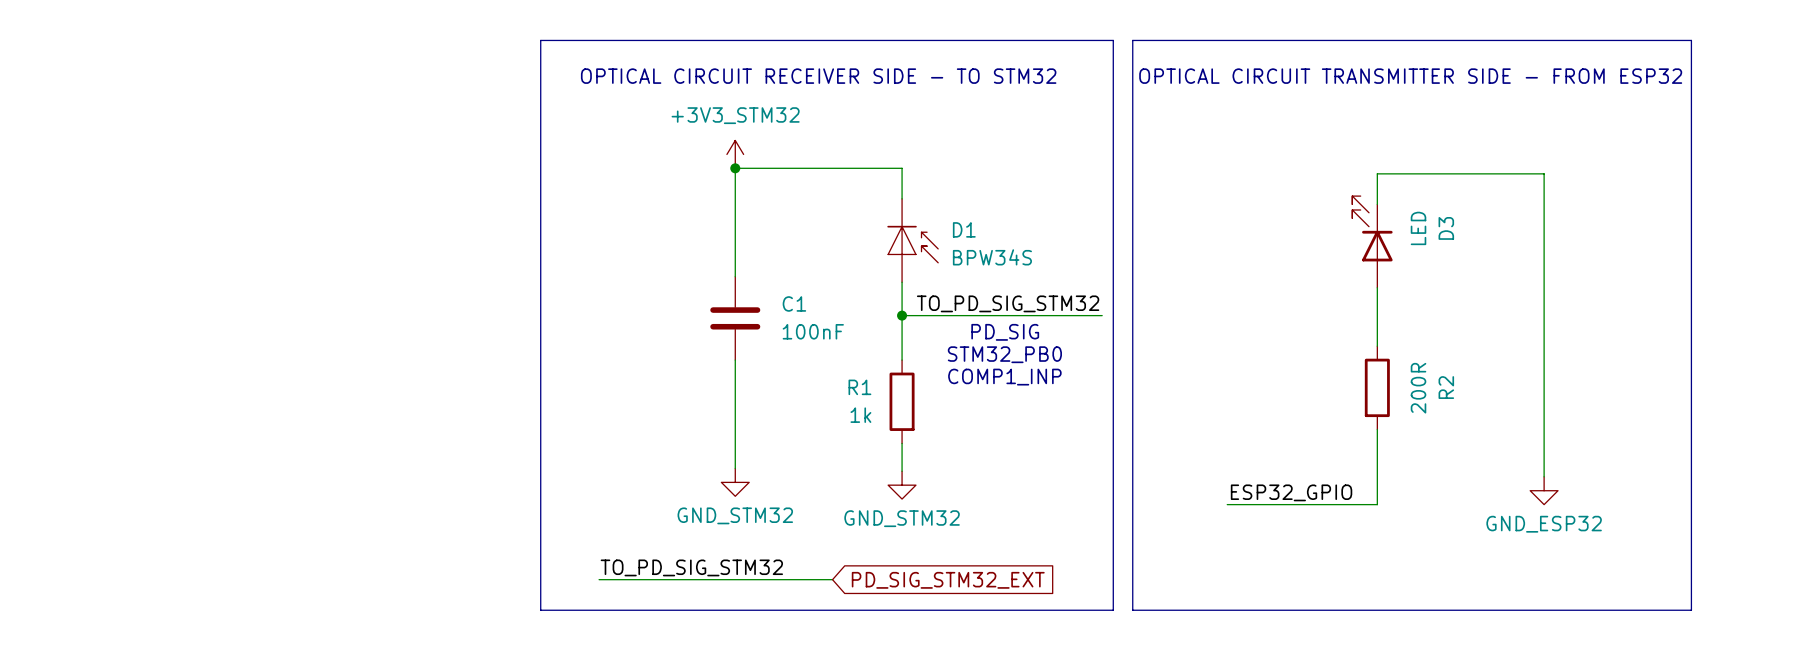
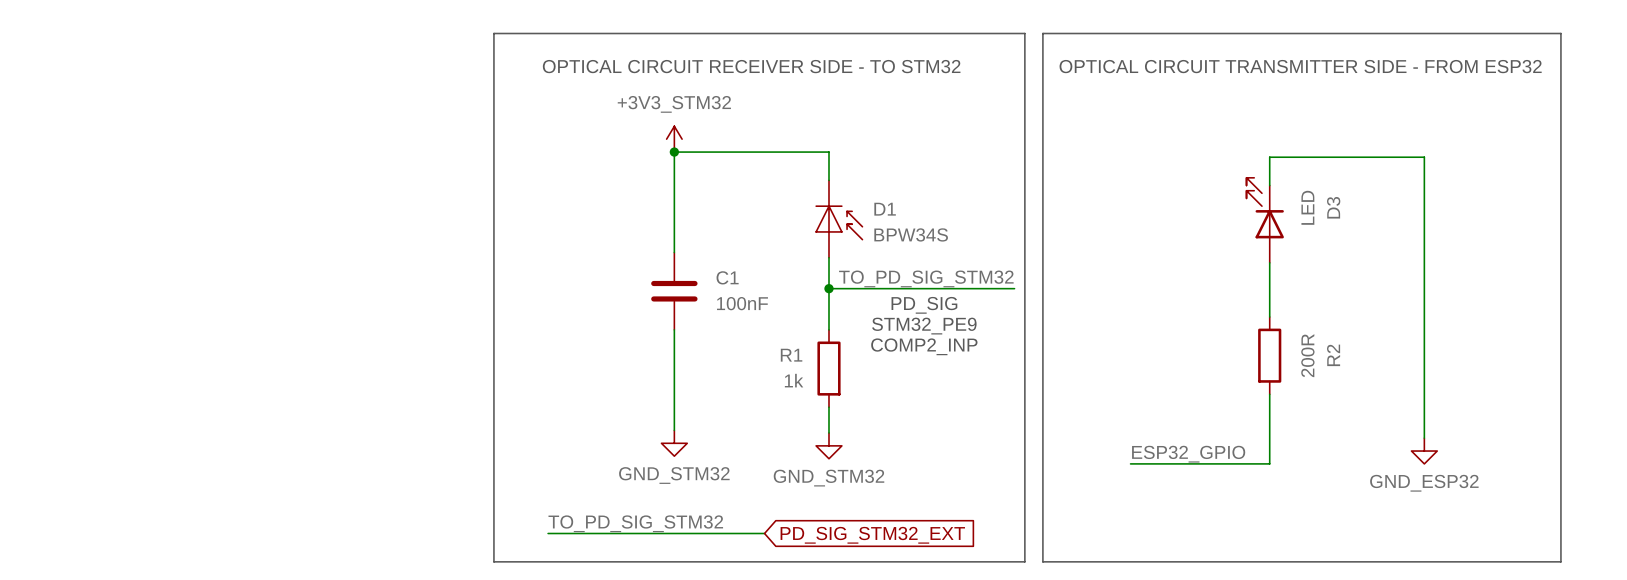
text: STM32_PB0 (1004, 354) -> STM32_PE9 (924, 326)
text: COMP1_INP (1004, 377) -> COMP2_INP (924, 346)

